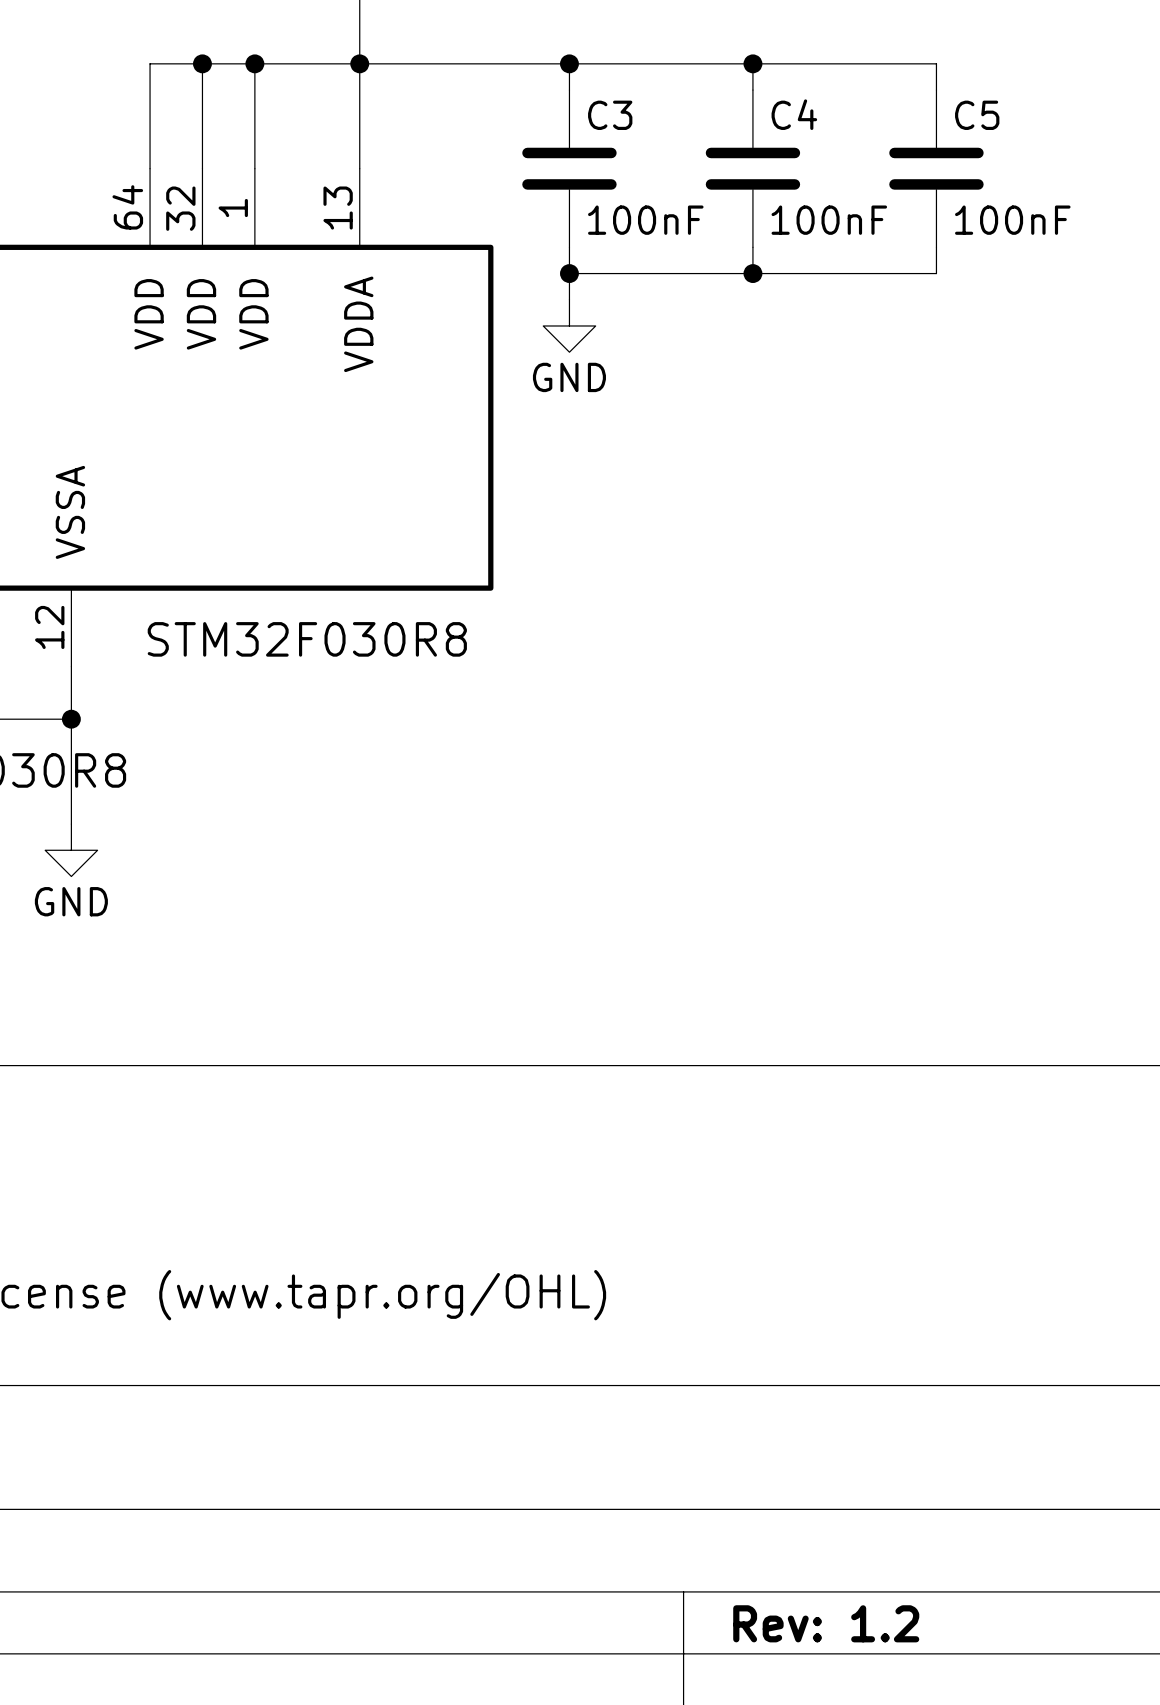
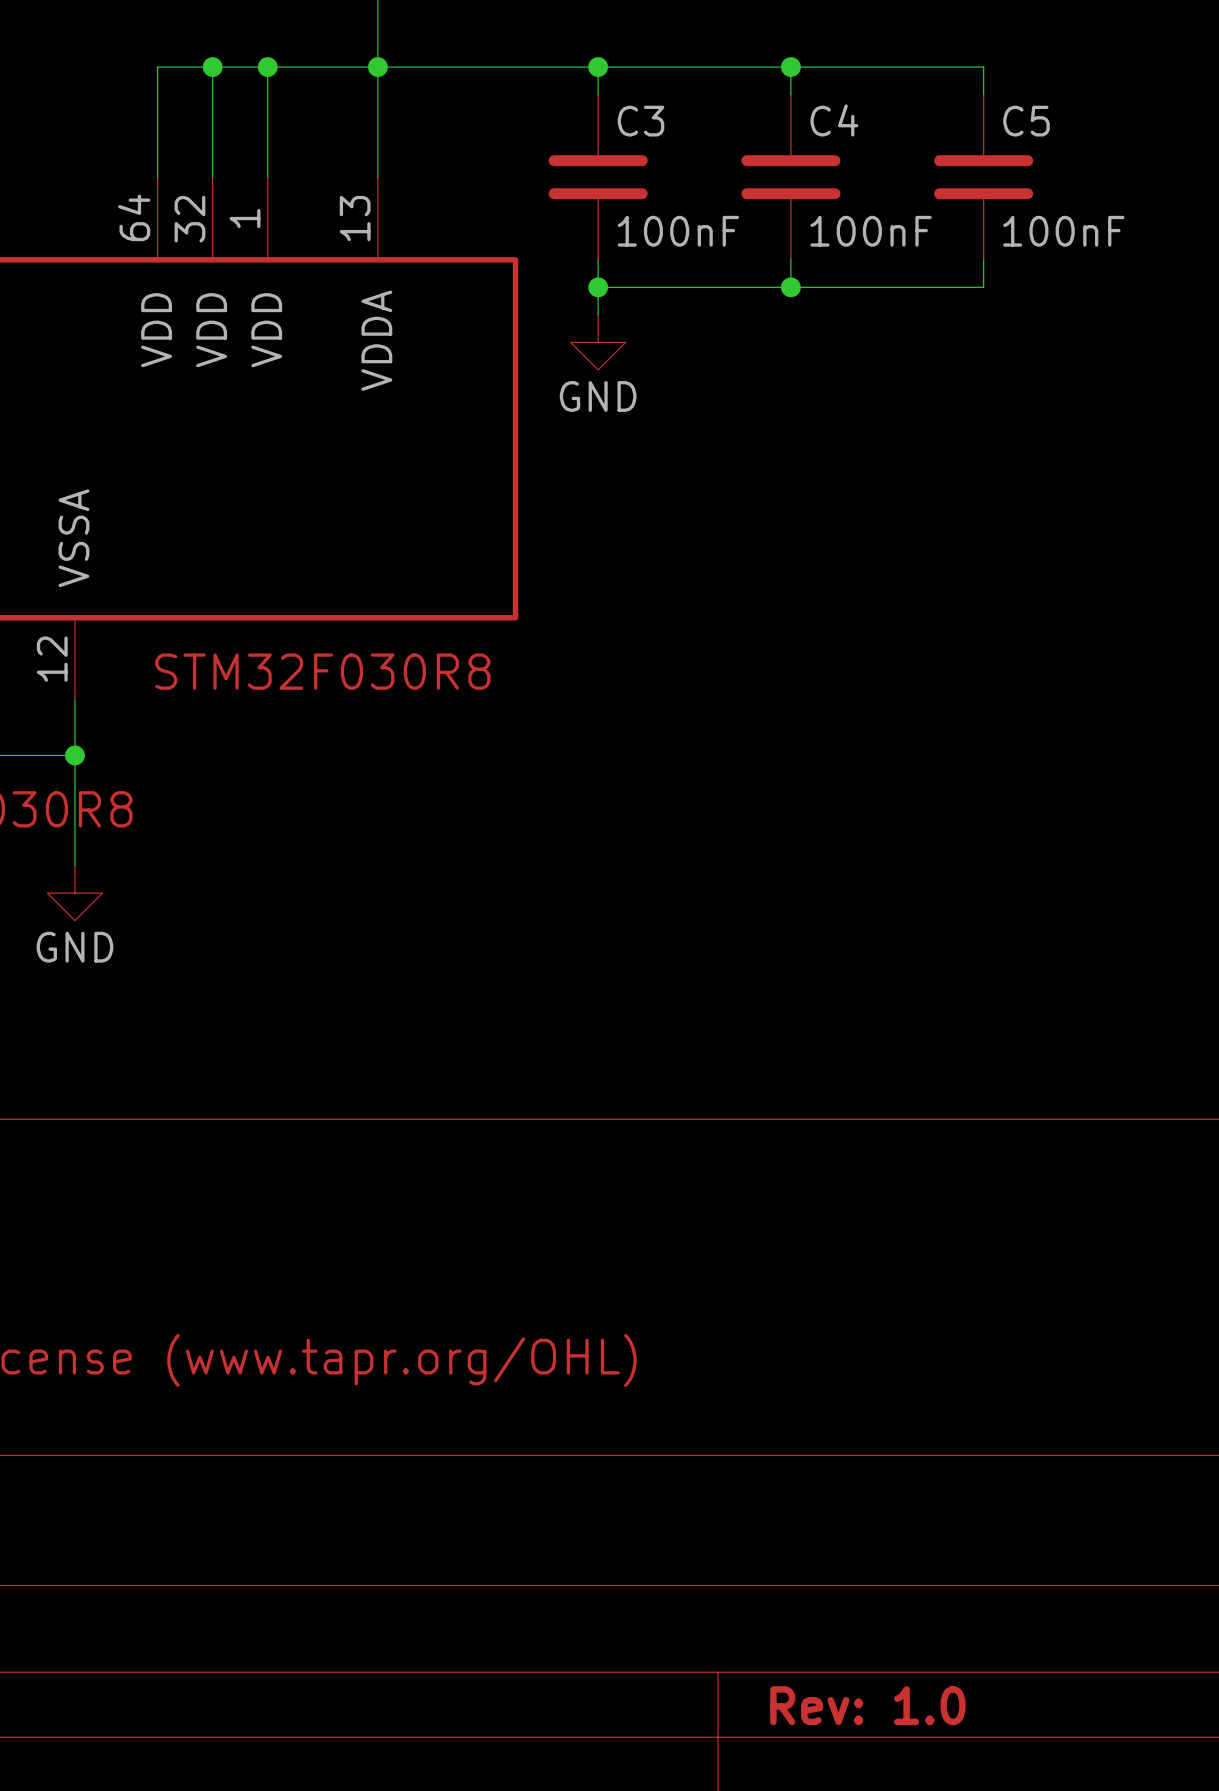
title block: Rev: 1.2 (826, 1623) -> Rev: 1.0 (867, 1705)

